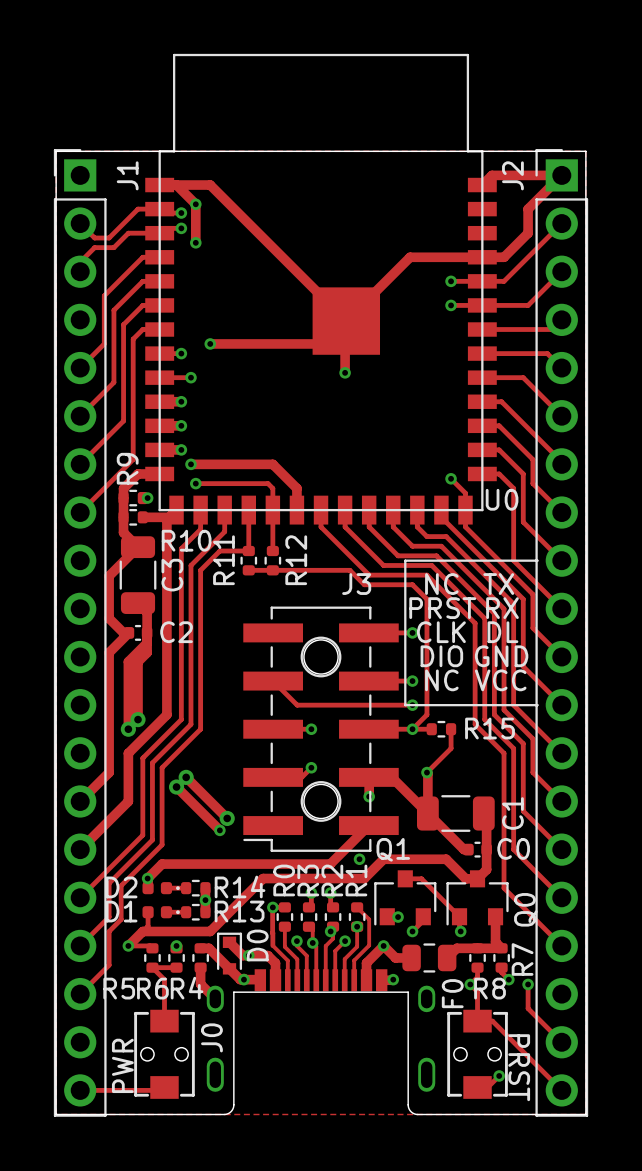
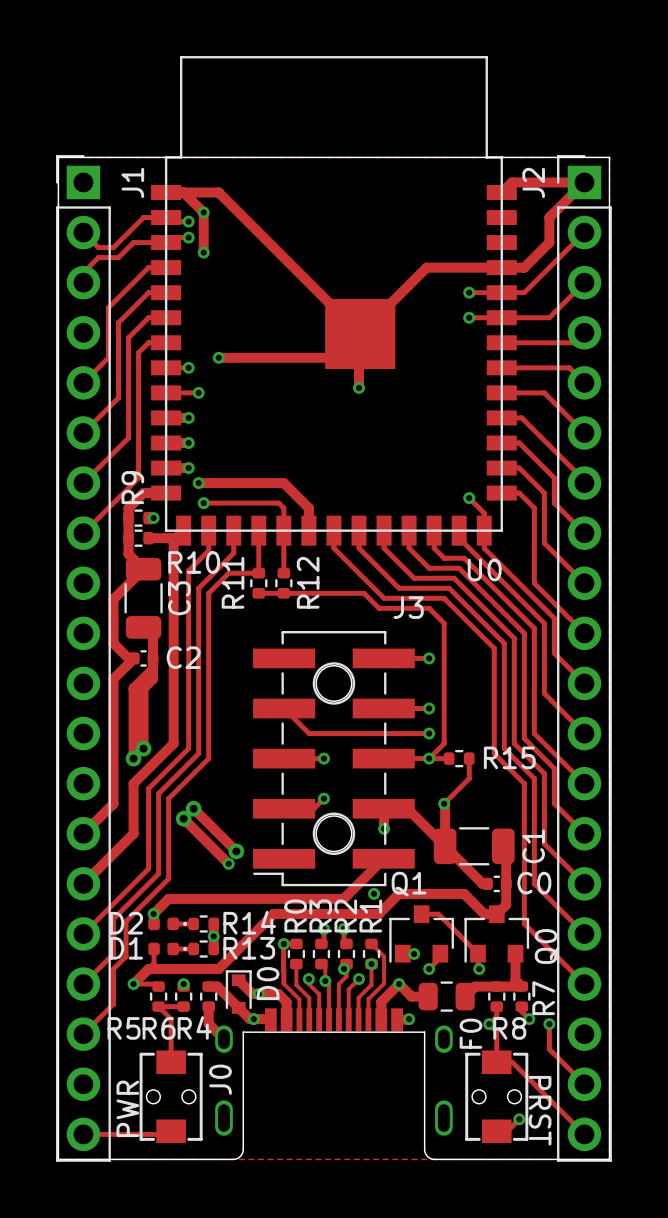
U0 name position: U0 (502, 499) -> U0 (484, 570)
line: (537, 560) (405, 560) (405, 705) (537, 705) -> none
J3 name position: J3 (356, 584) -> J3 (408, 607)
text: NC (441, 584) -> none
text: TX (498, 584) -> none
text: PRST (442, 608) -> none
text: RX (502, 608) -> none
text: CLK (441, 632) -> none
text: DL (502, 632) -> none
text: DIO (441, 656) -> none
text: GND (501, 656) -> none
text: NC (441, 680) -> none
text: VCC (500, 680) -> none

